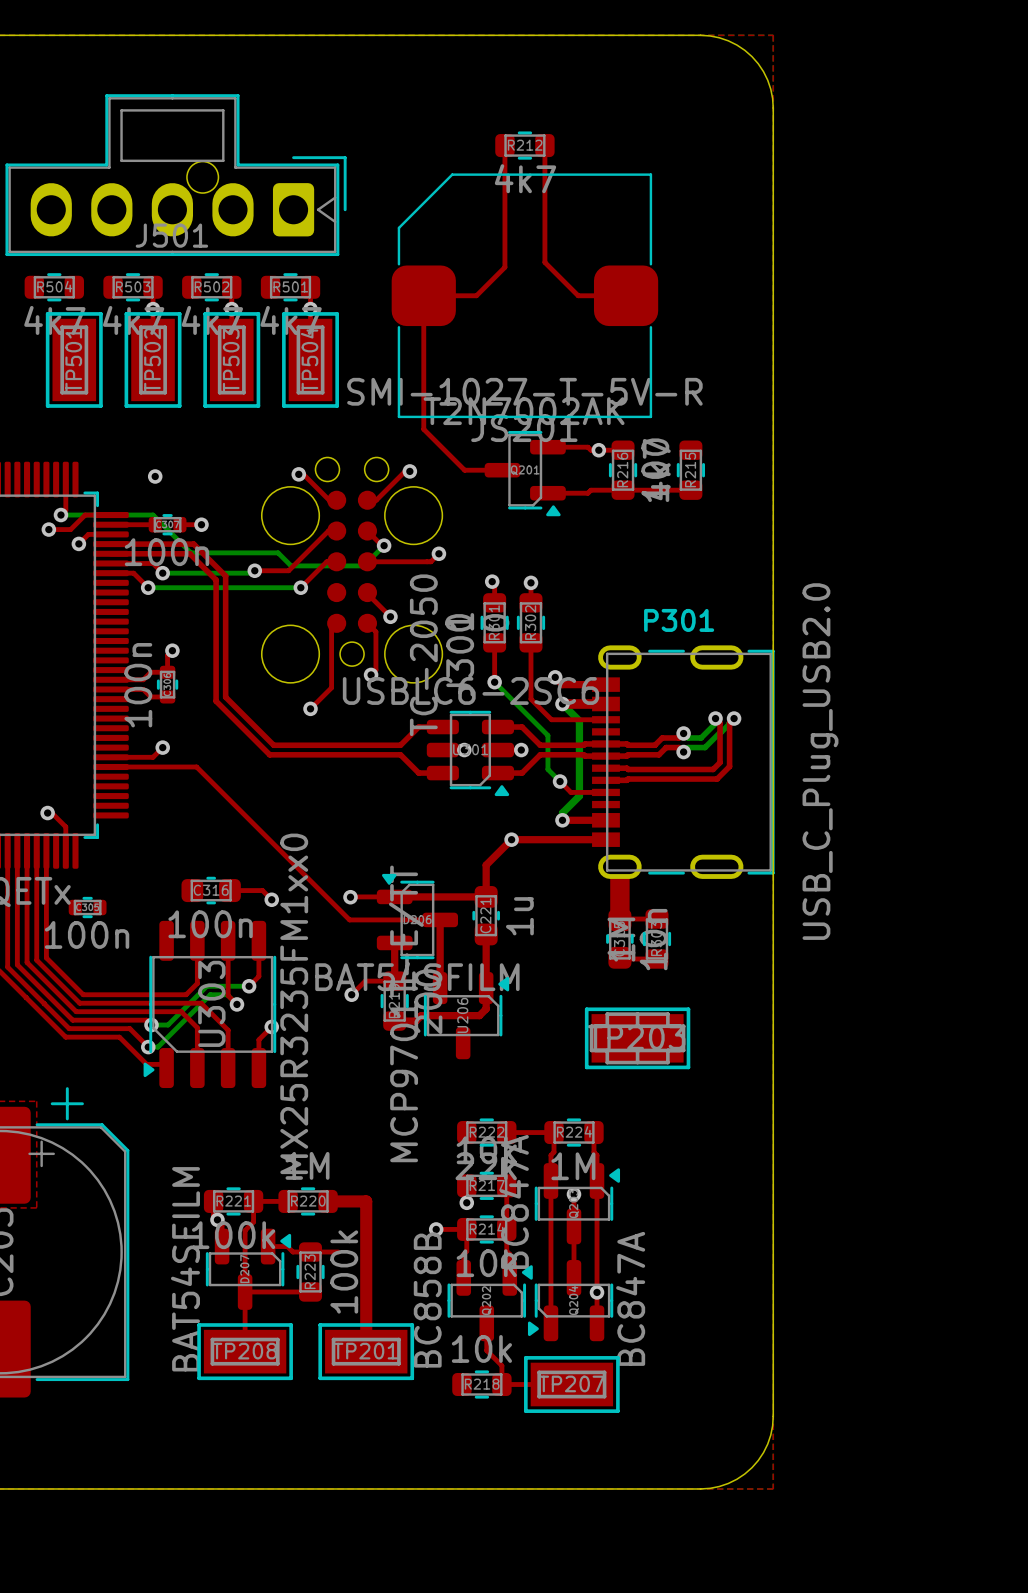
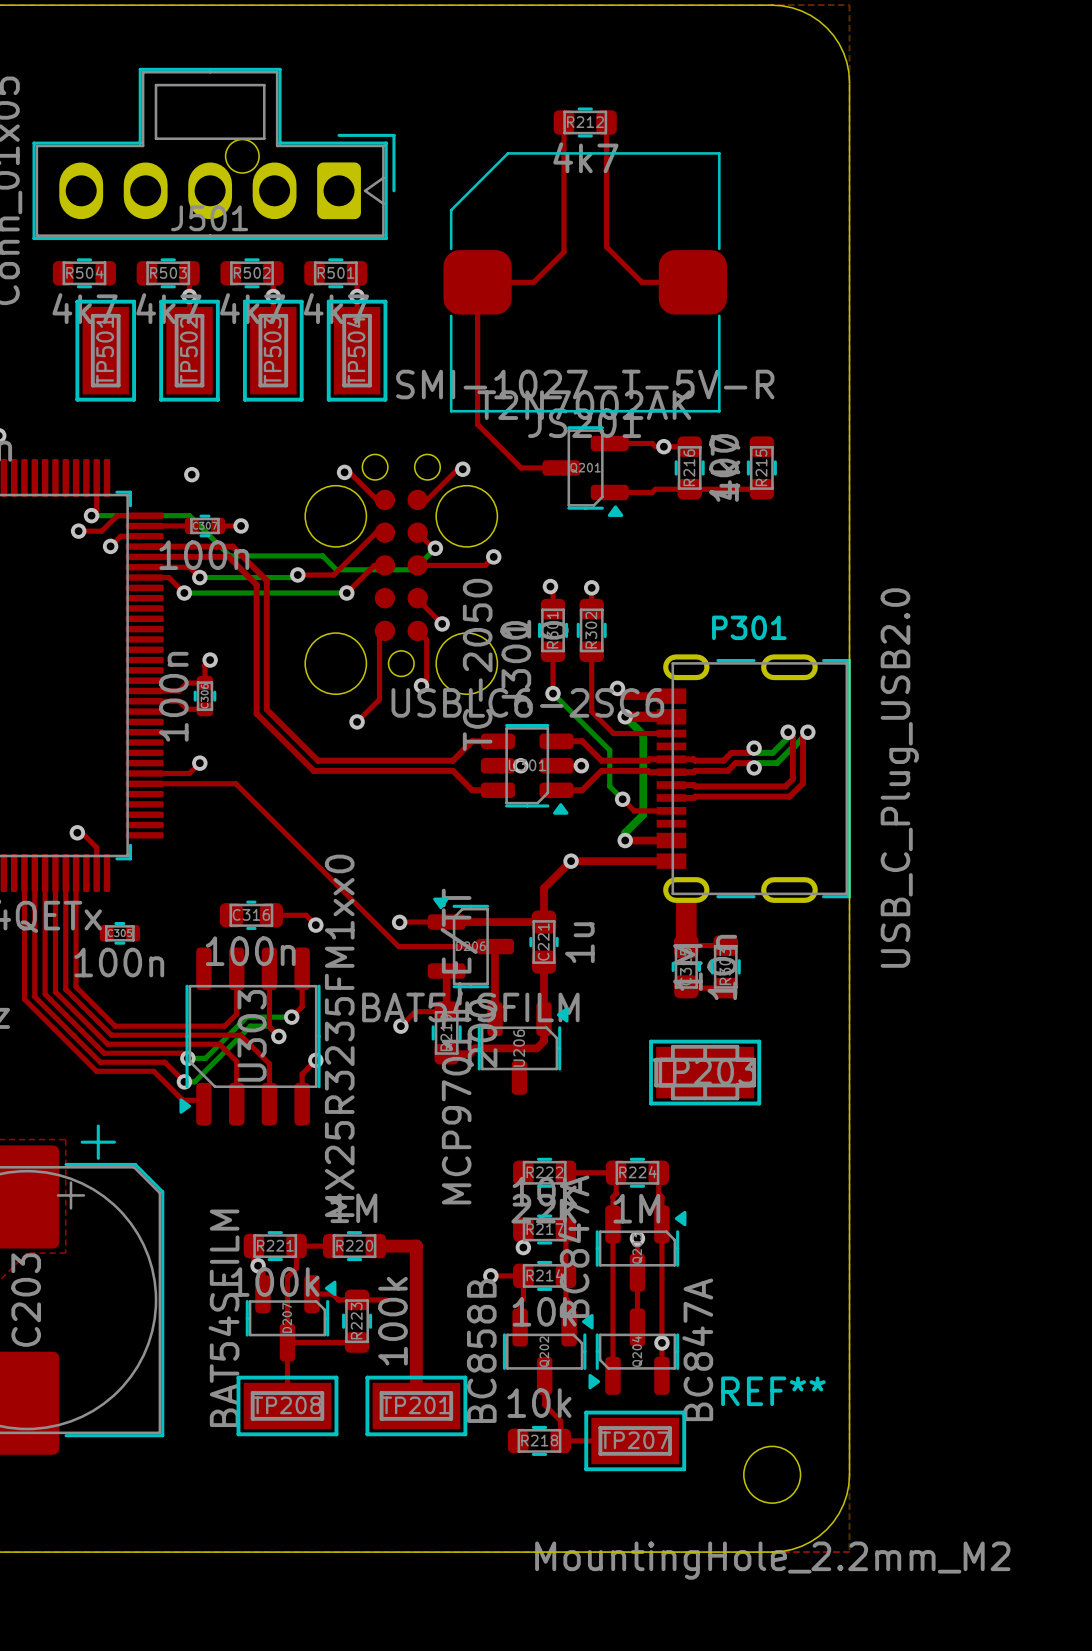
REF**: none -> MountingHole_2.2mm_M2 (772, 1474)

